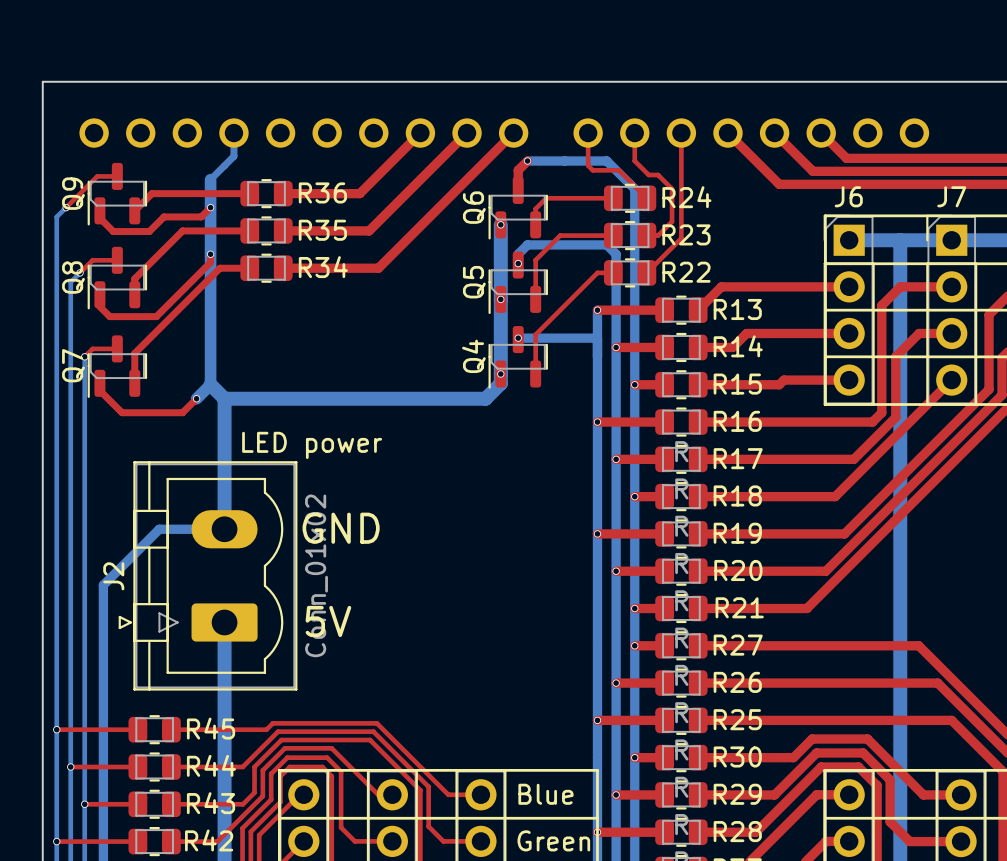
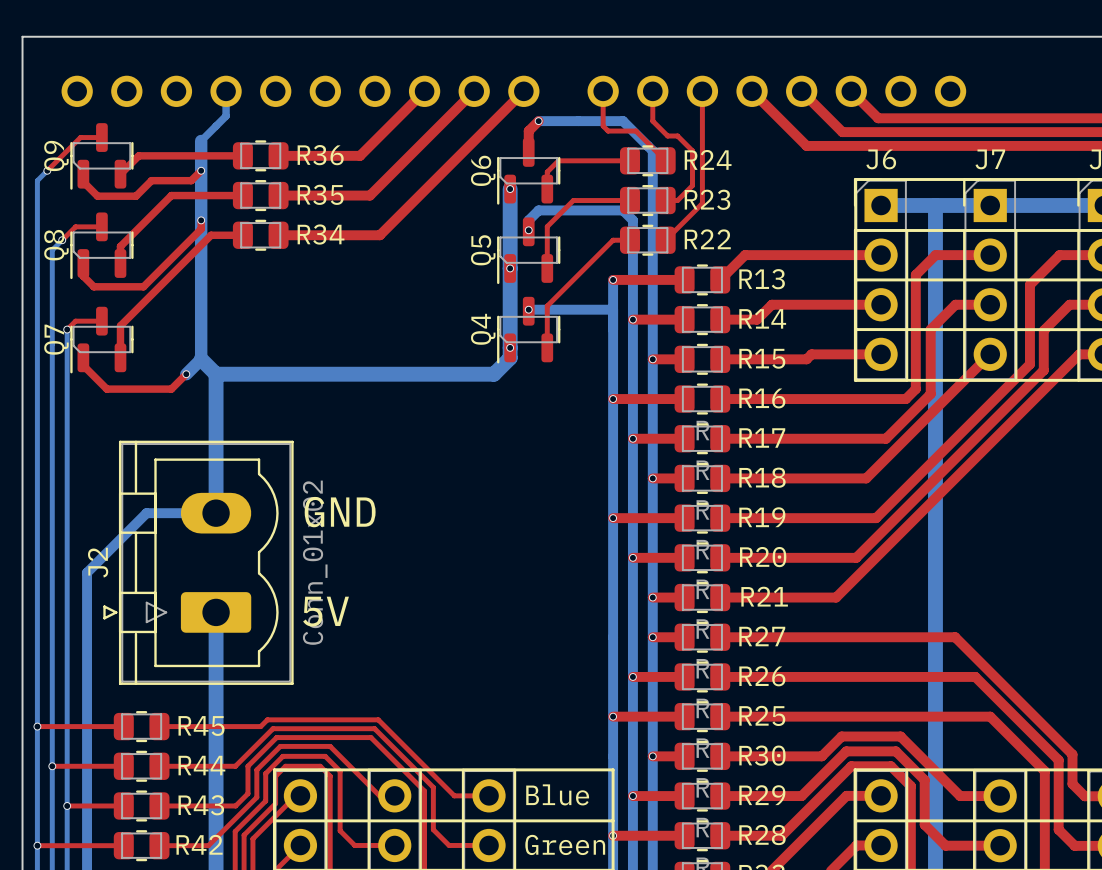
text: LED power (312, 445) -> none

